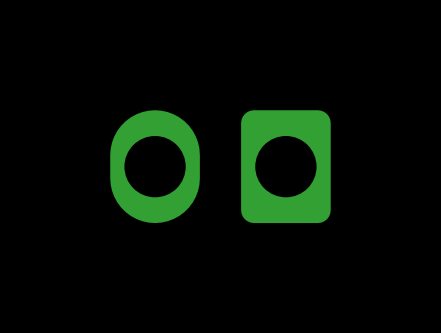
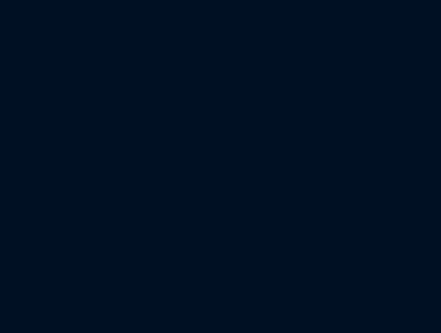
part: (220, 166) -> none

